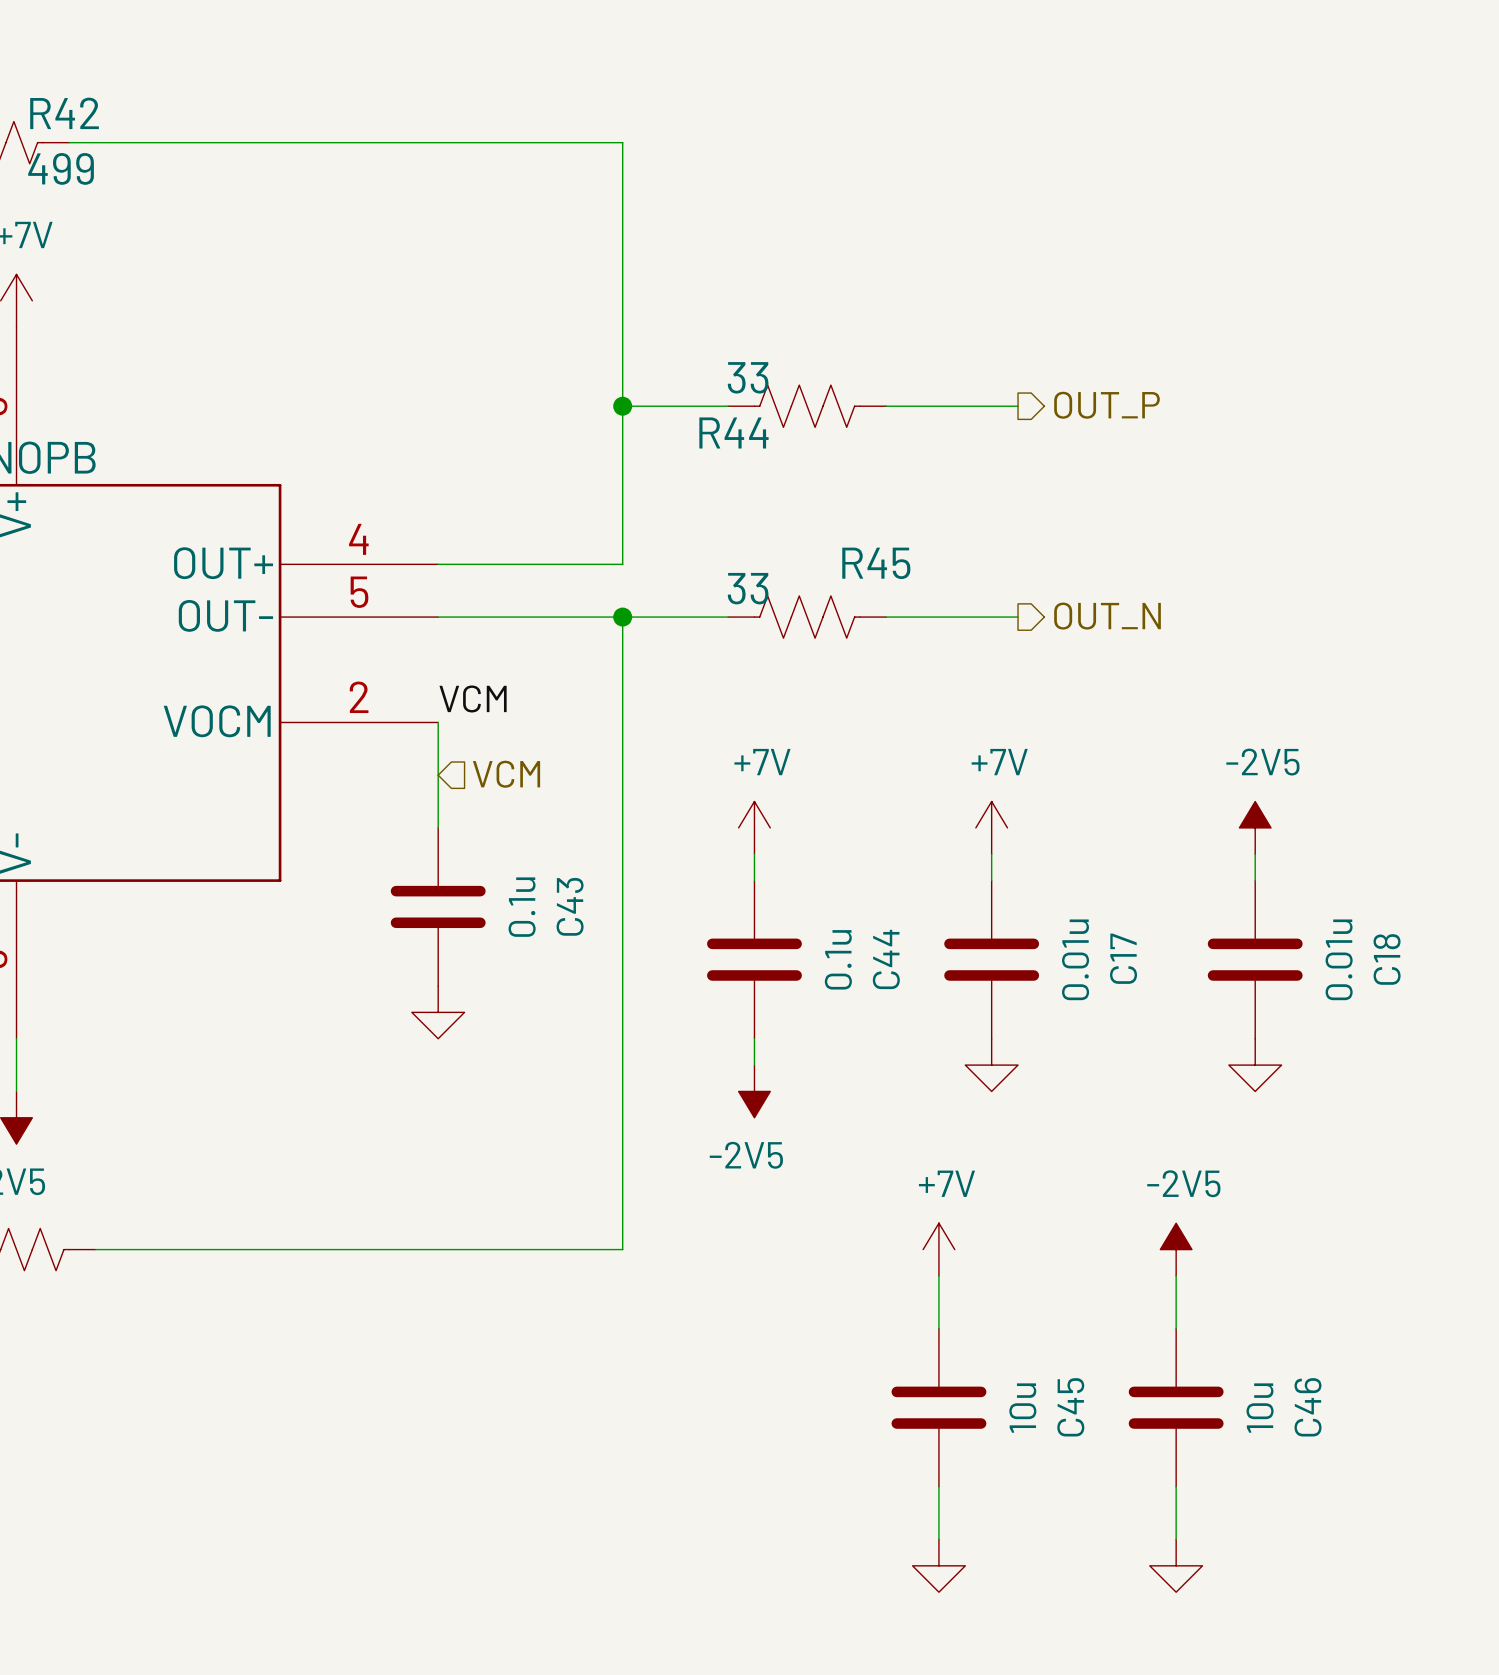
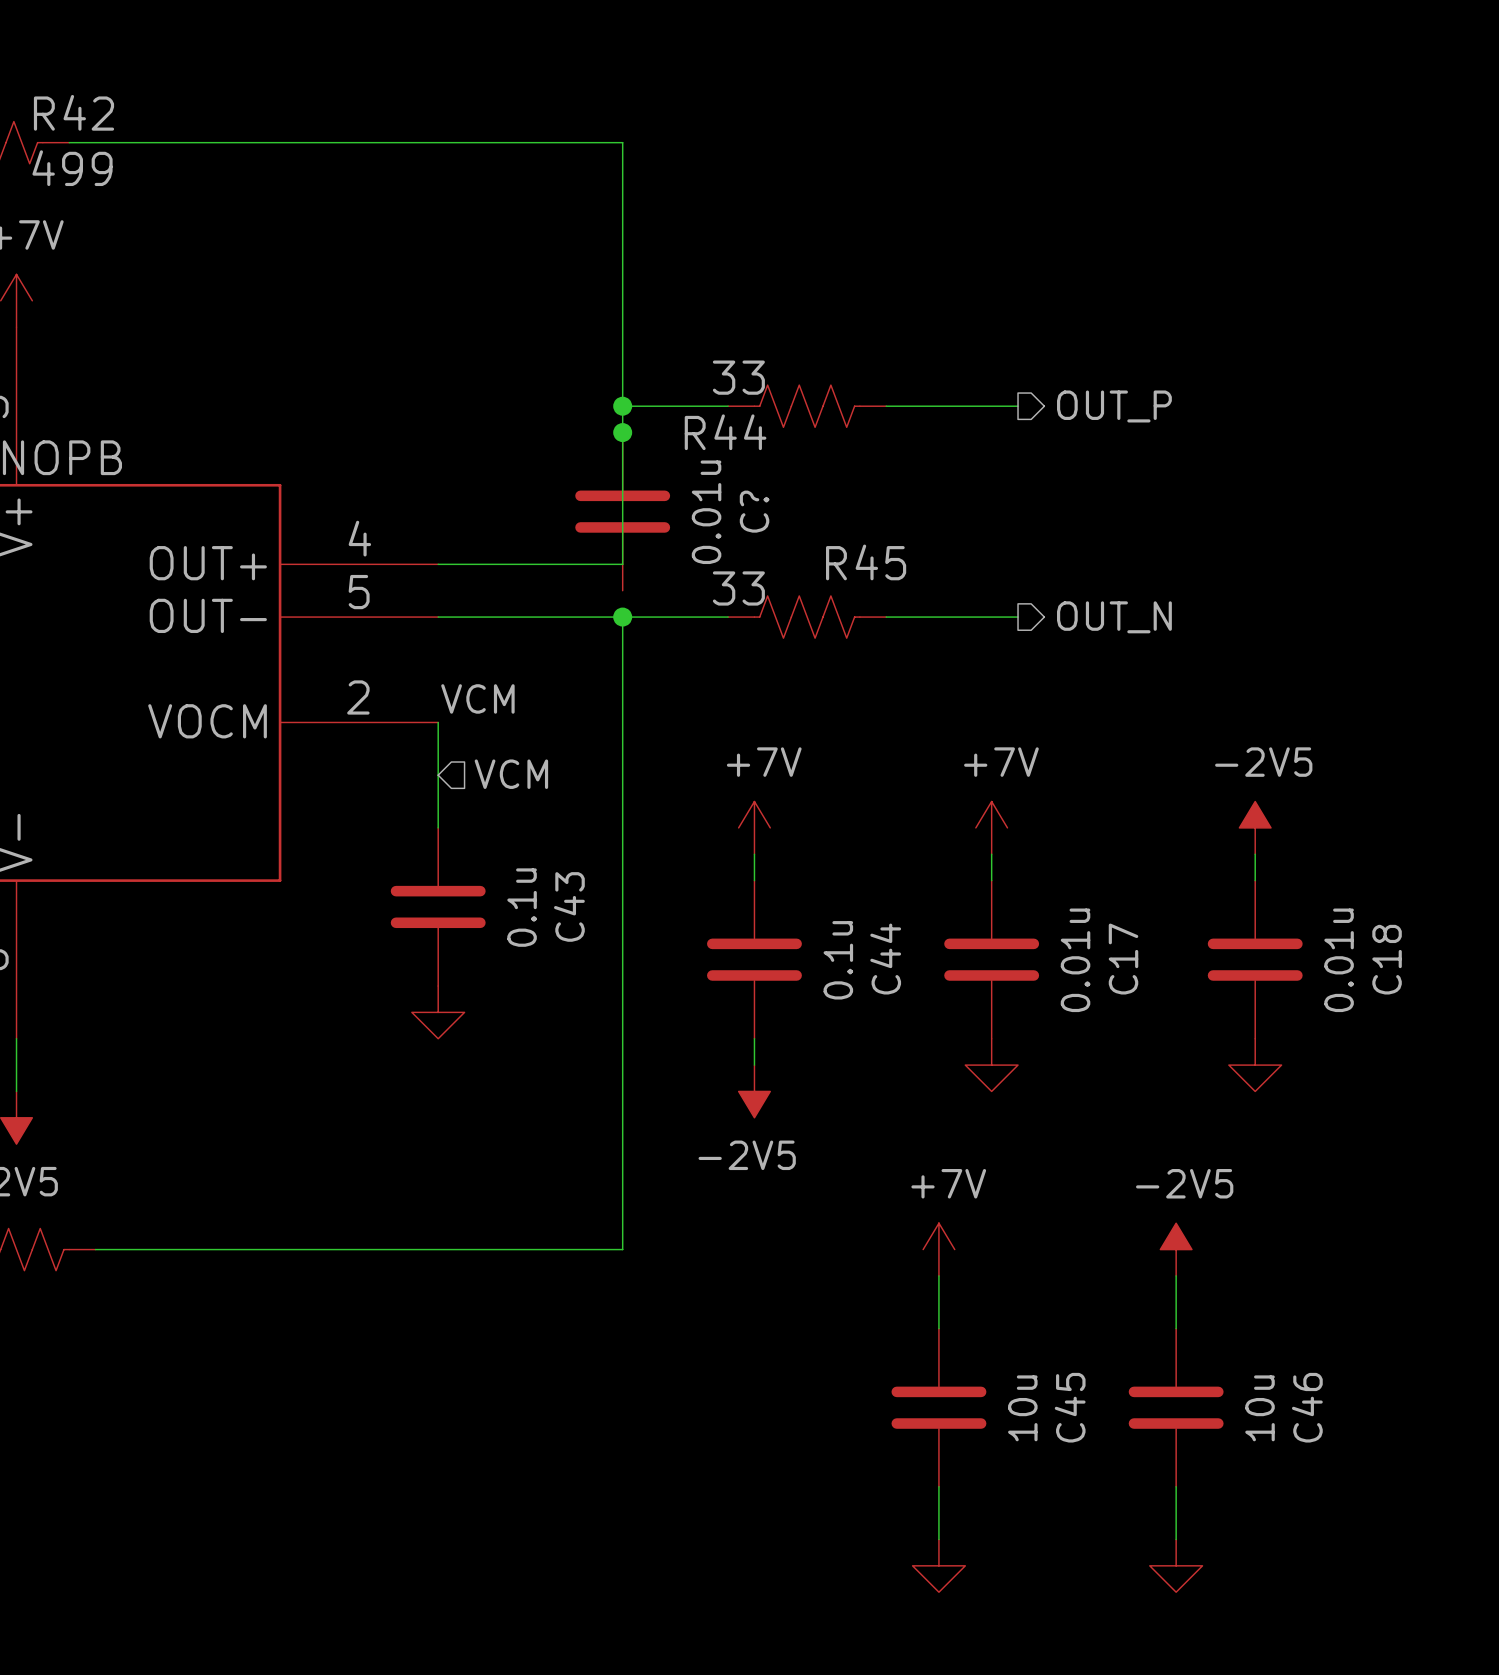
junction: none -> (622, 432)
C?: none -> 0.01u (622, 511)

